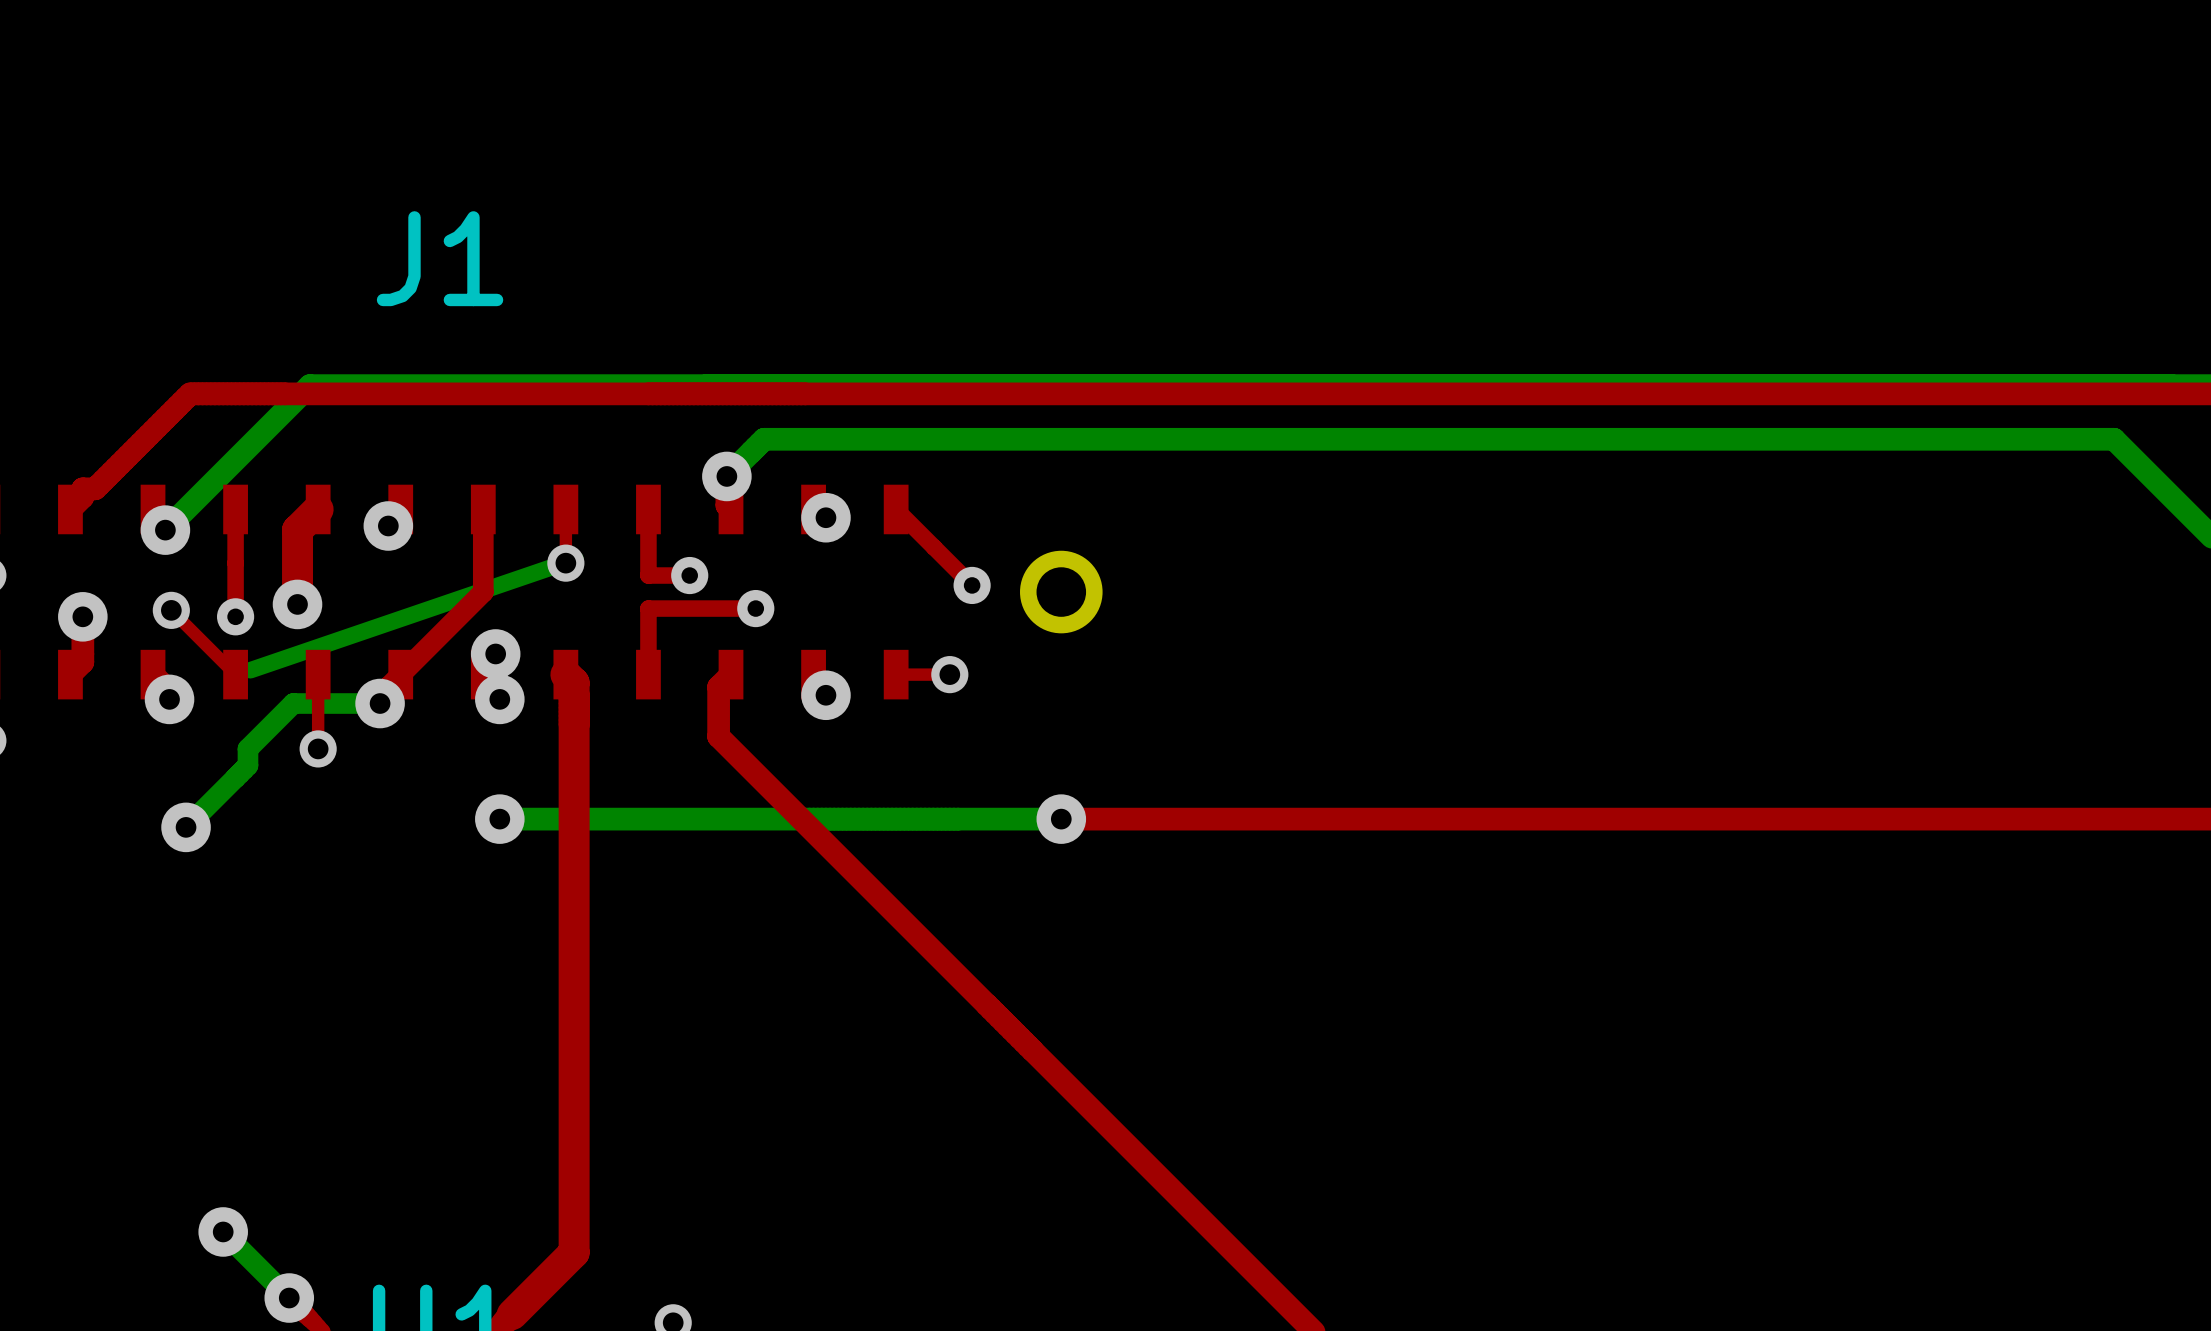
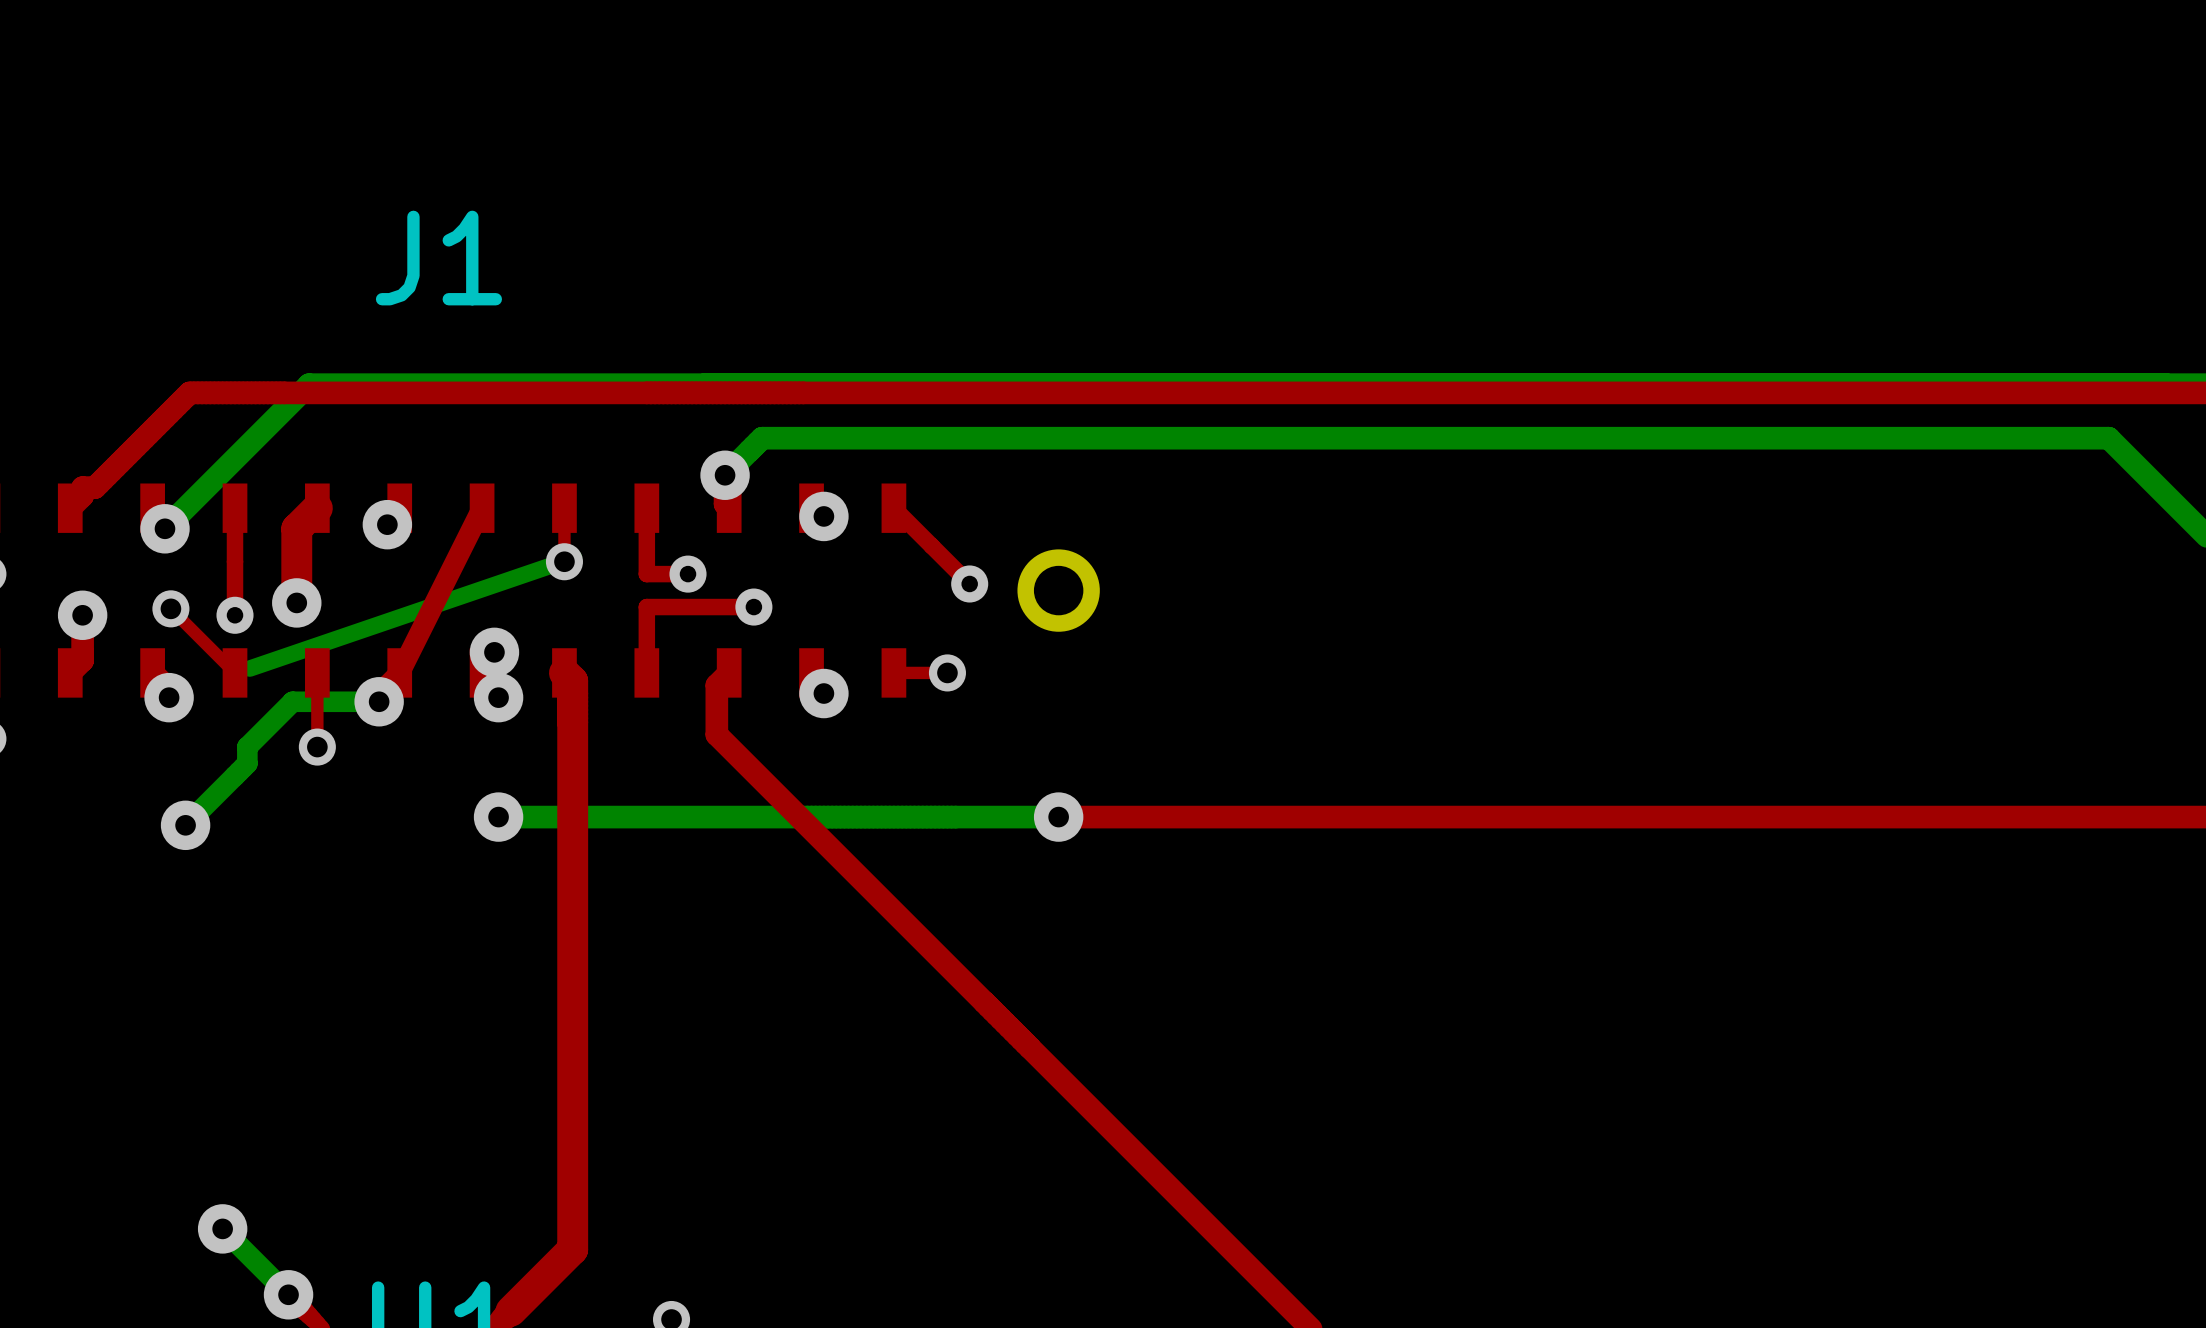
top track: (483, 509) (483, 592) (400, 674) -> (482, 508) (399, 672)

